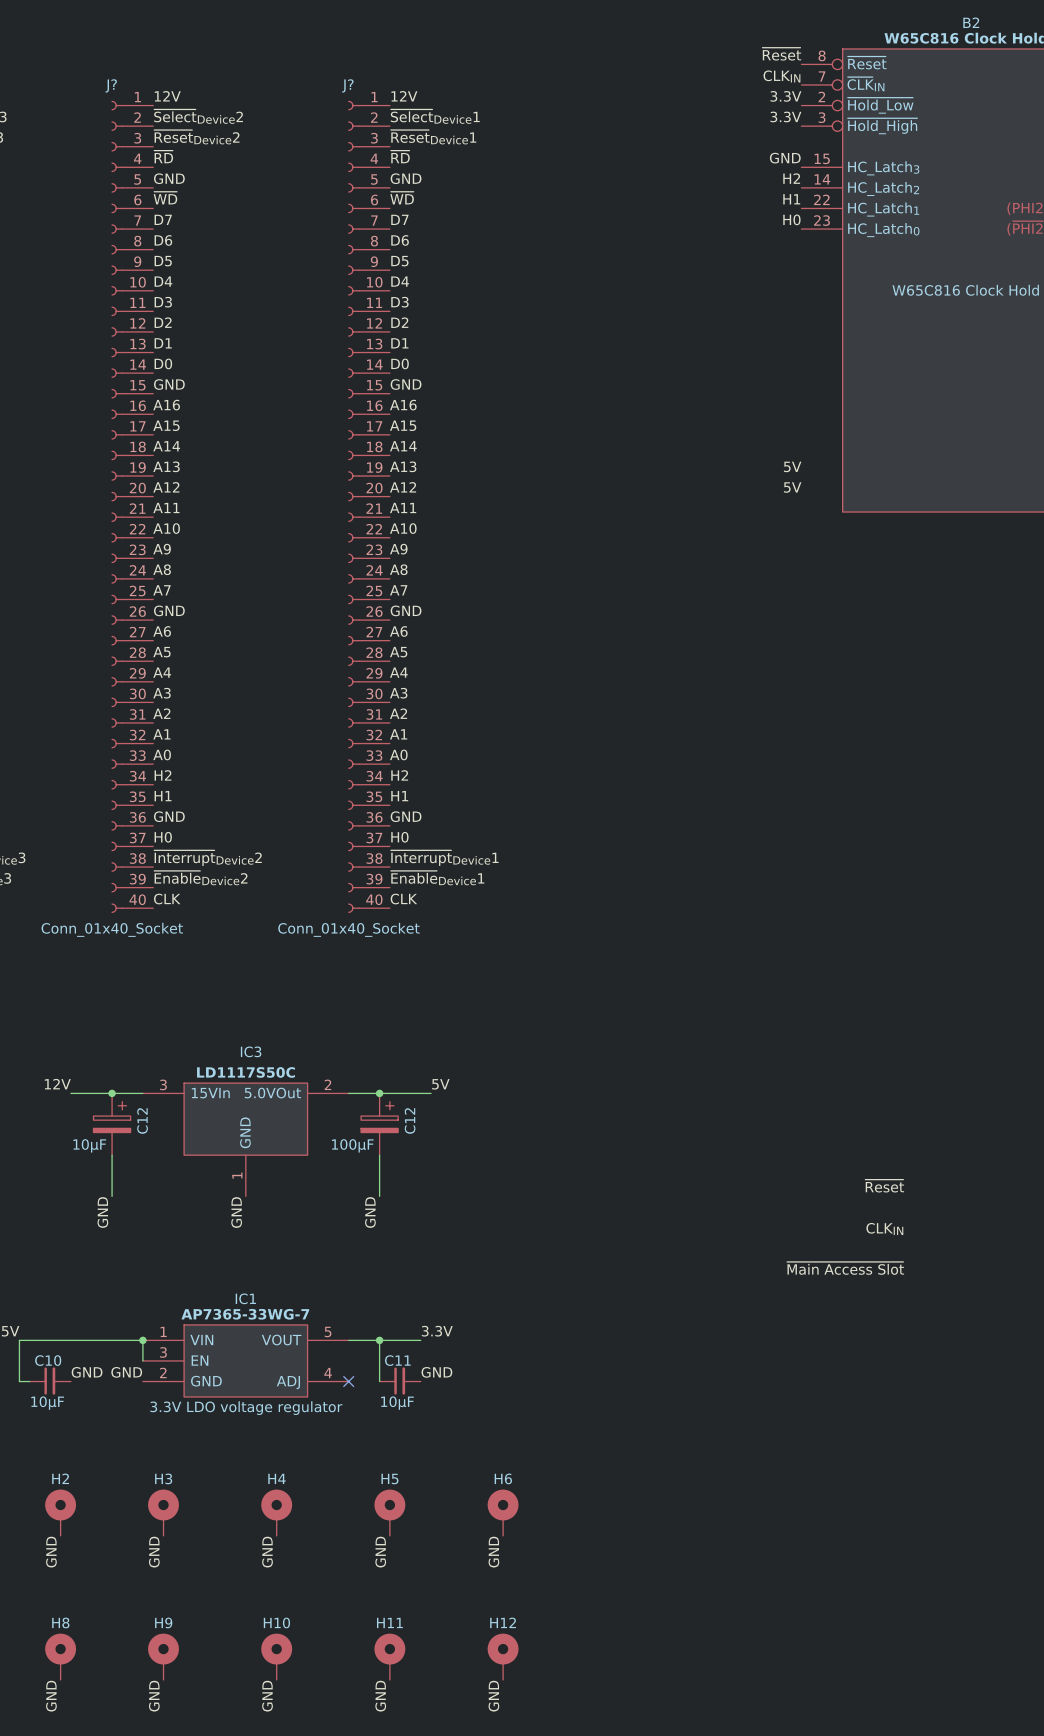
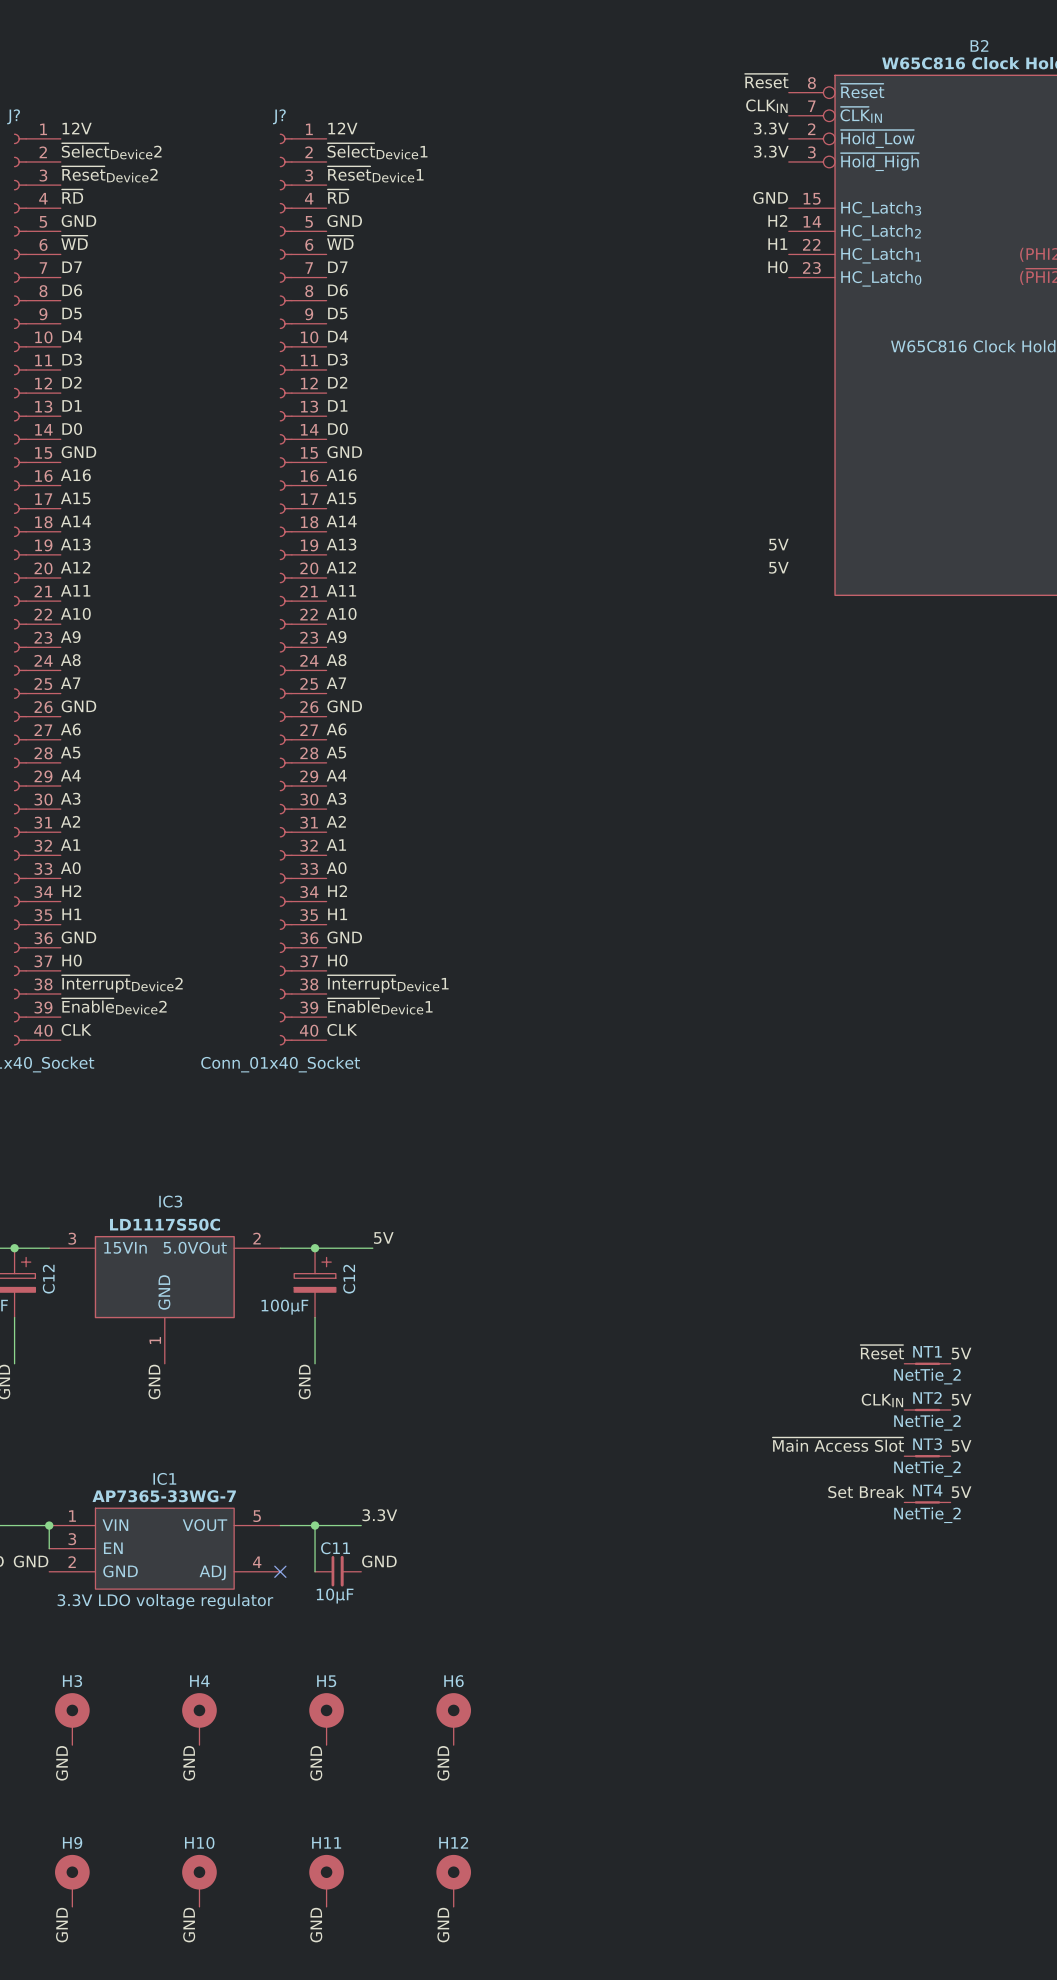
label: none -> 5V (961, 1353)
NT1: none -> NetTie_2 (927, 1363)
label: none -> 5V (961, 1399)
NT2: none -> NetTie_2 (927, 1410)
label: none -> 5V (961, 1446)
NT3: none -> NetTie_2 (927, 1456)
label: none -> Set Break (866, 1492)
label: none -> 5V (961, 1492)
NT4: none -> NetTie_2 (927, 1502)

